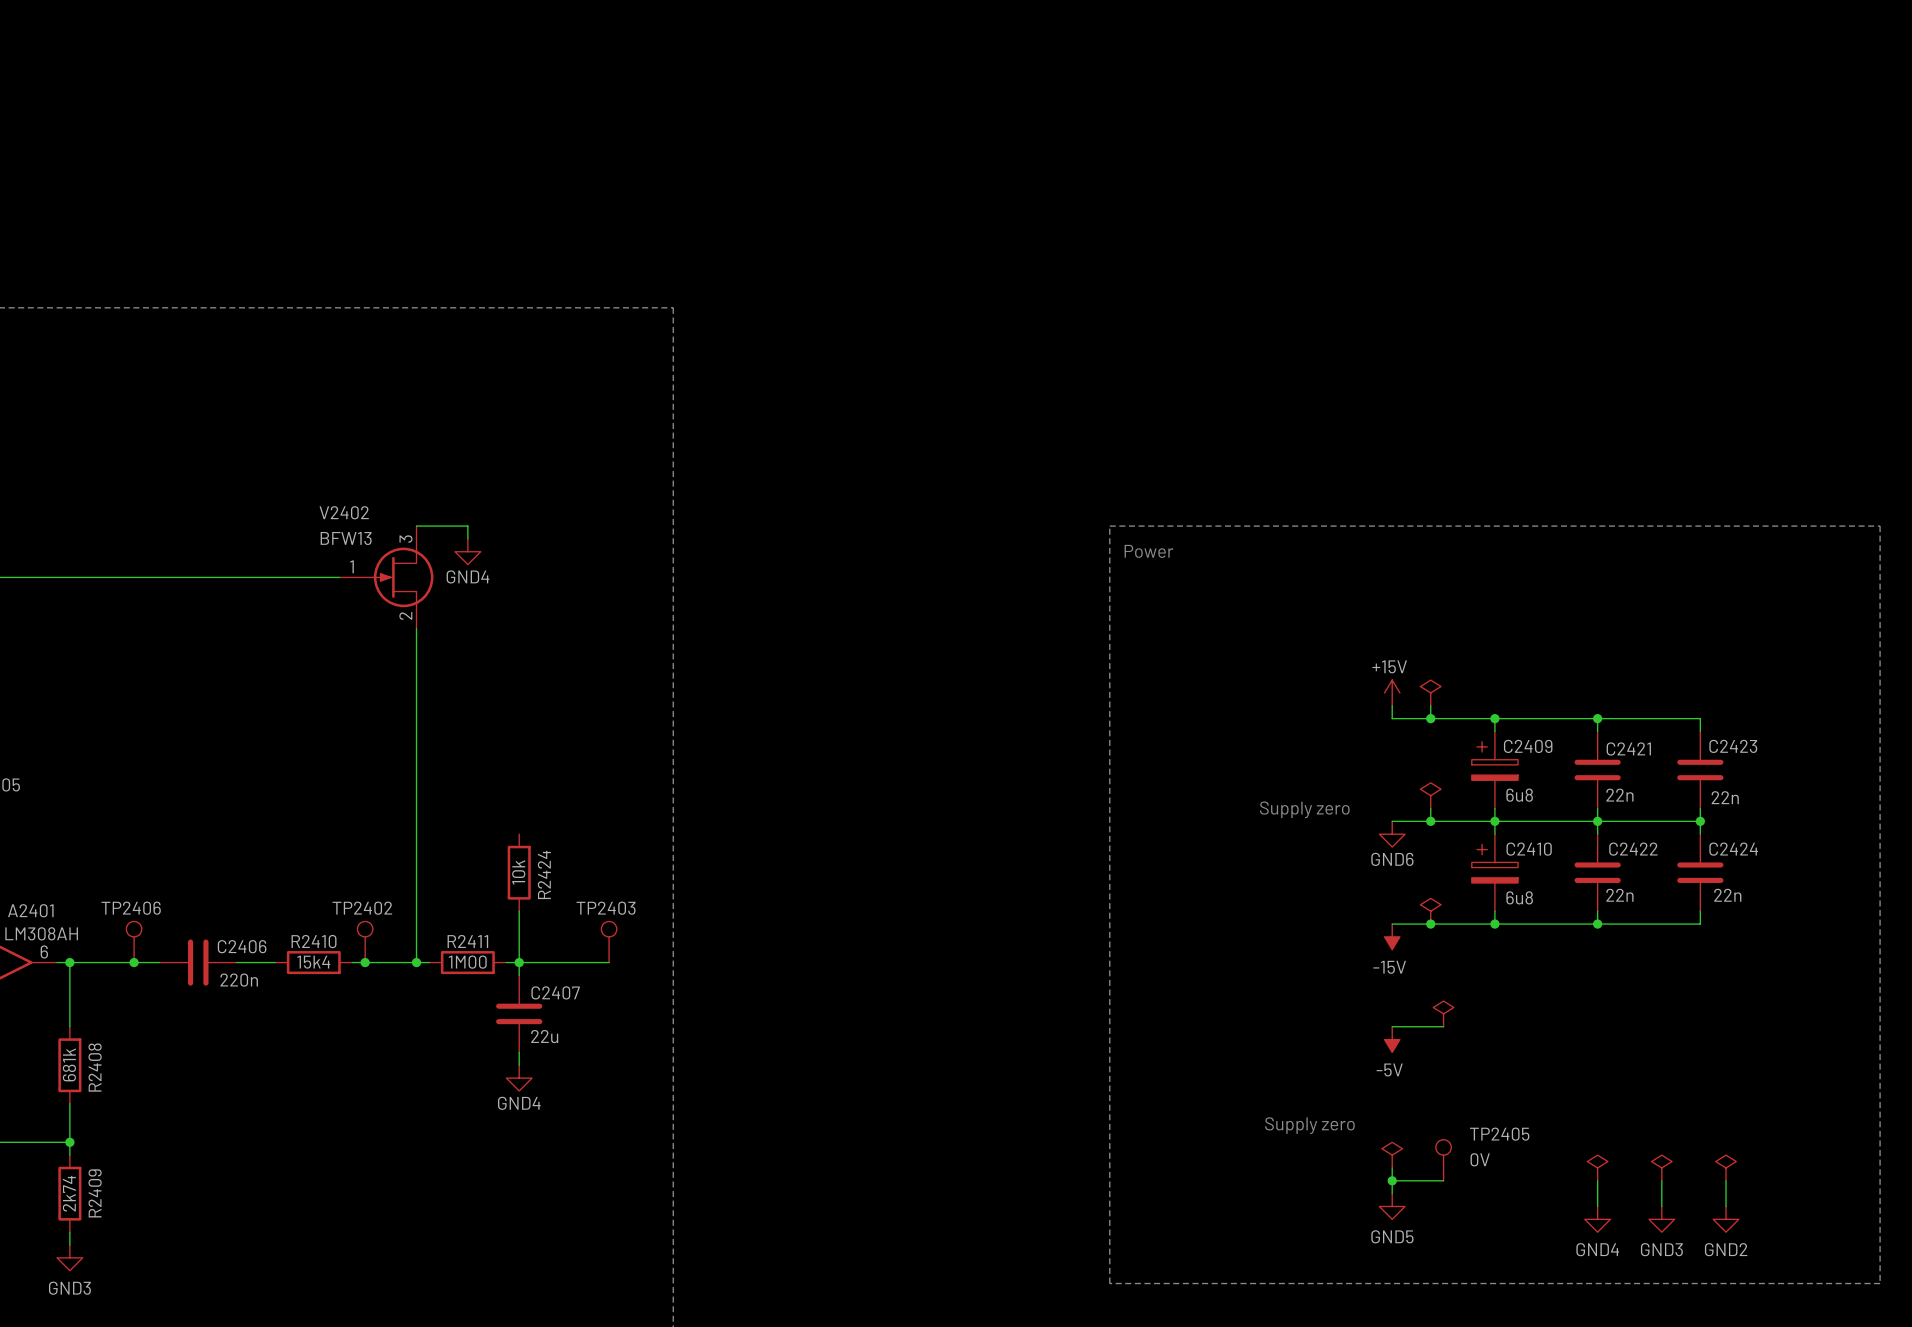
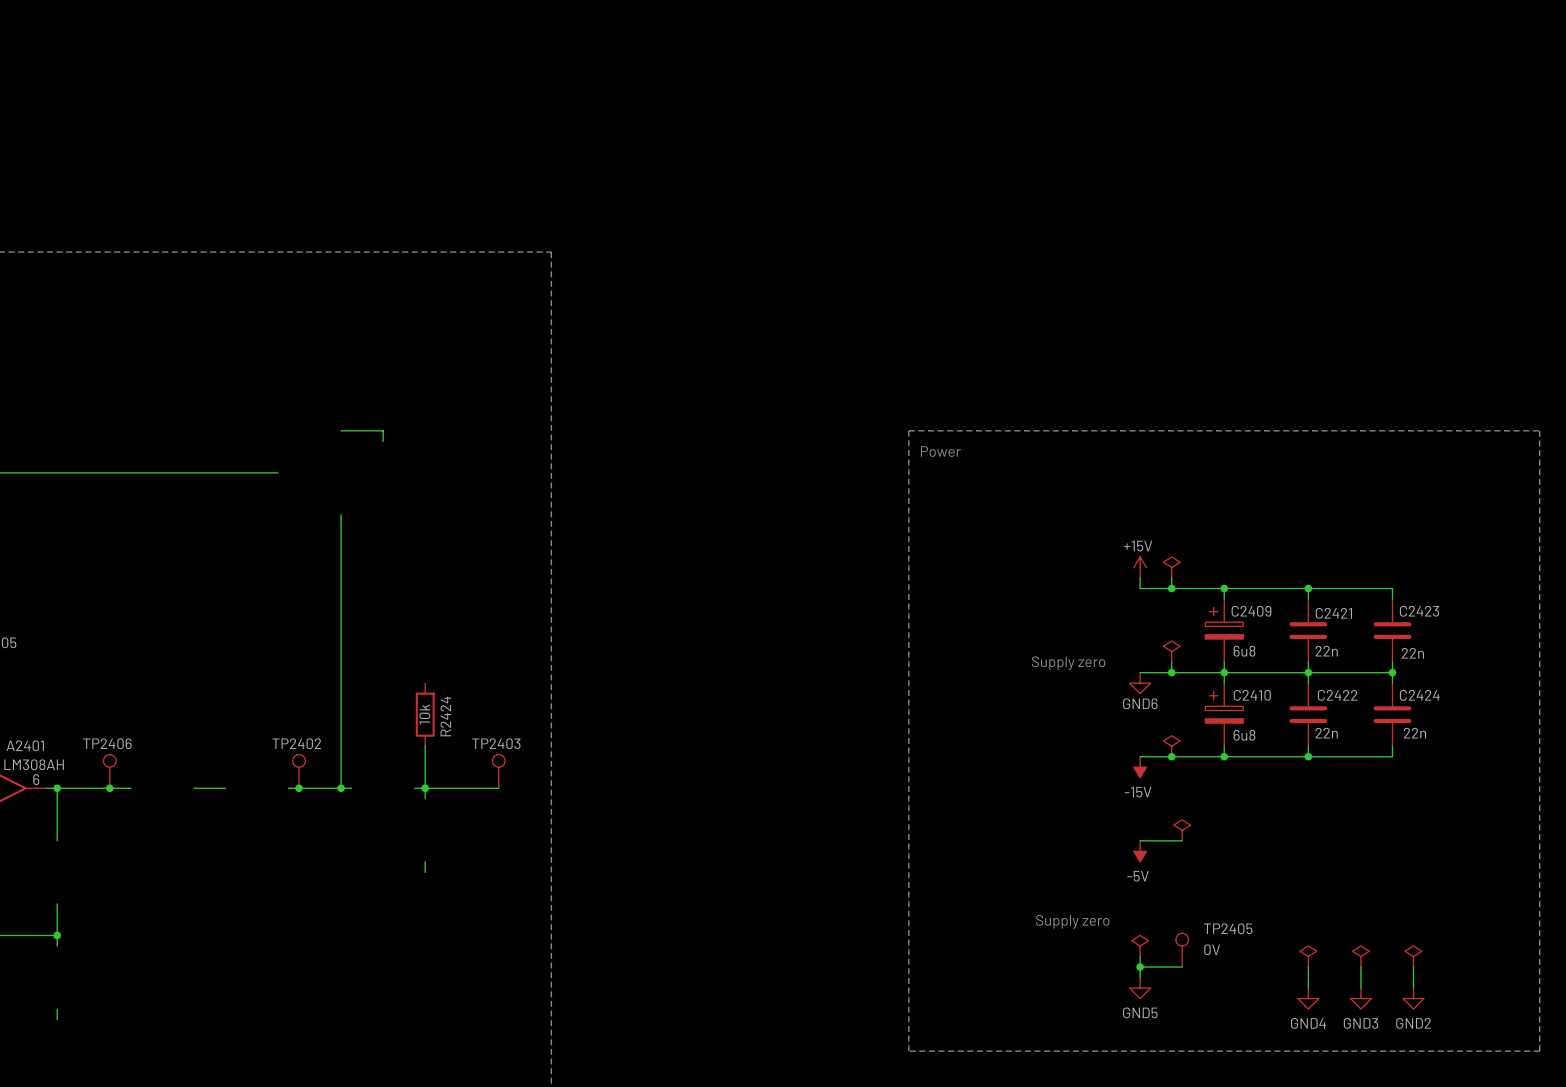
power symbol: GND4 (467, 551) -> none
V2402: BFW13 (386, 577) -> none
C2406: 220n (198, 962) -> none
R2410: 15k4 (313, 962) -> none
R2411: 1M00 (467, 962) -> none
C2407: 22u (519, 1013) -> none
R2408: 681k (69, 1065) -> none
power symbol: GND4 (519, 1078) -> none
R2409: 2k74 (69, 1193) -> none
power symbol: GND3 (69, 1257) -> none

